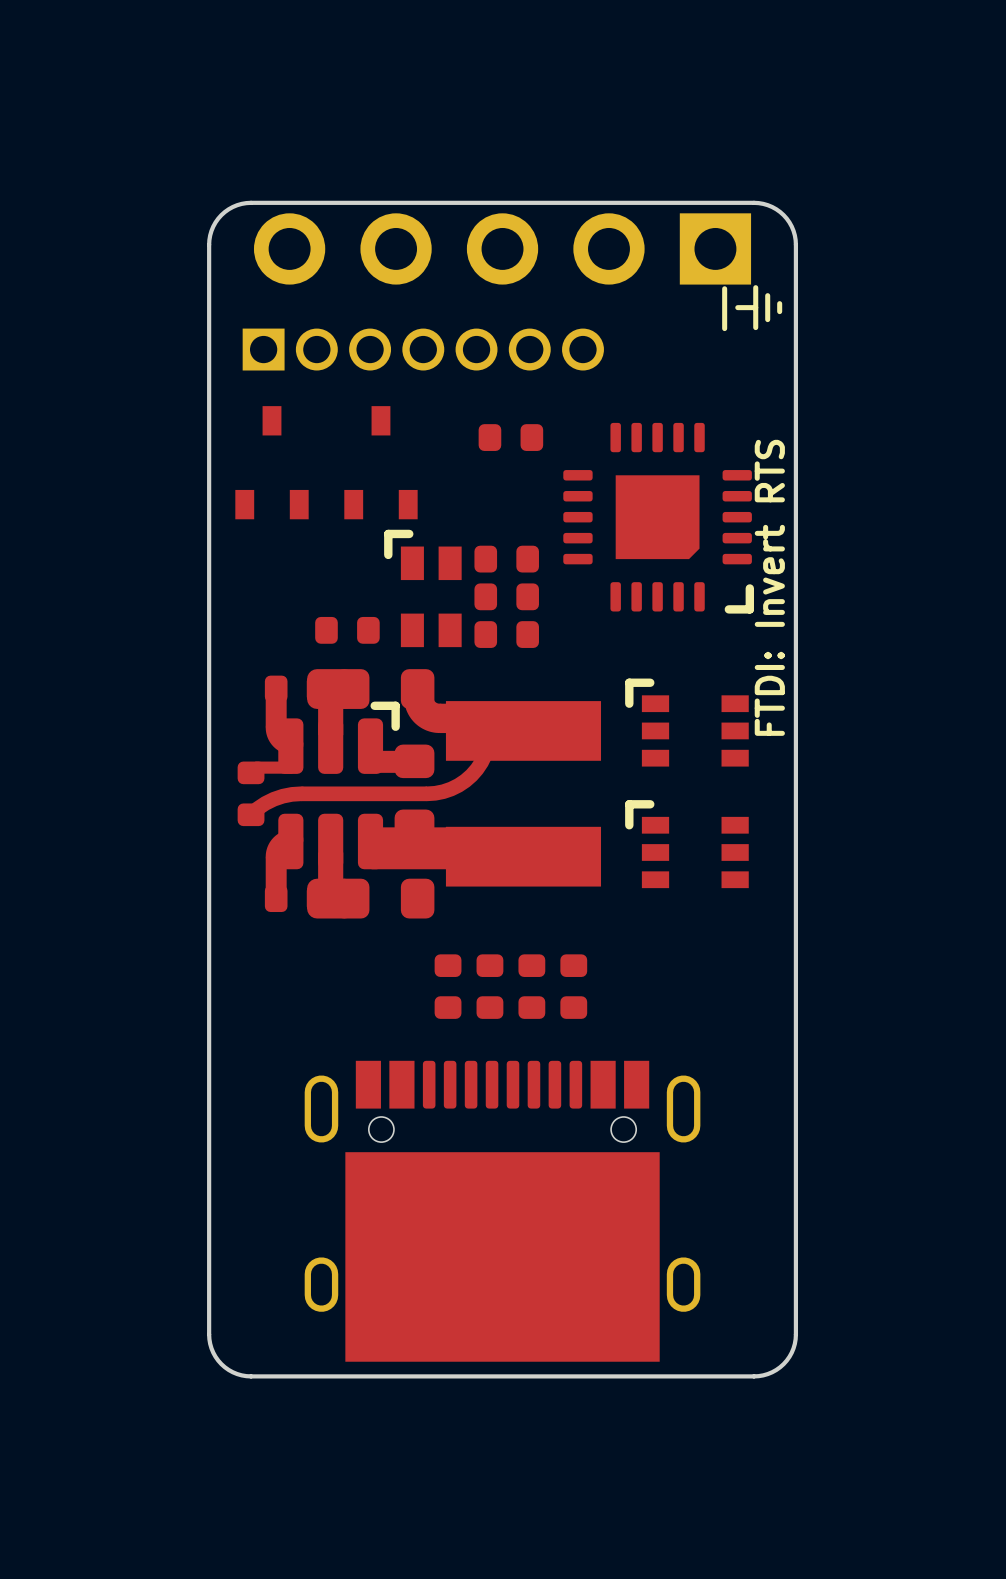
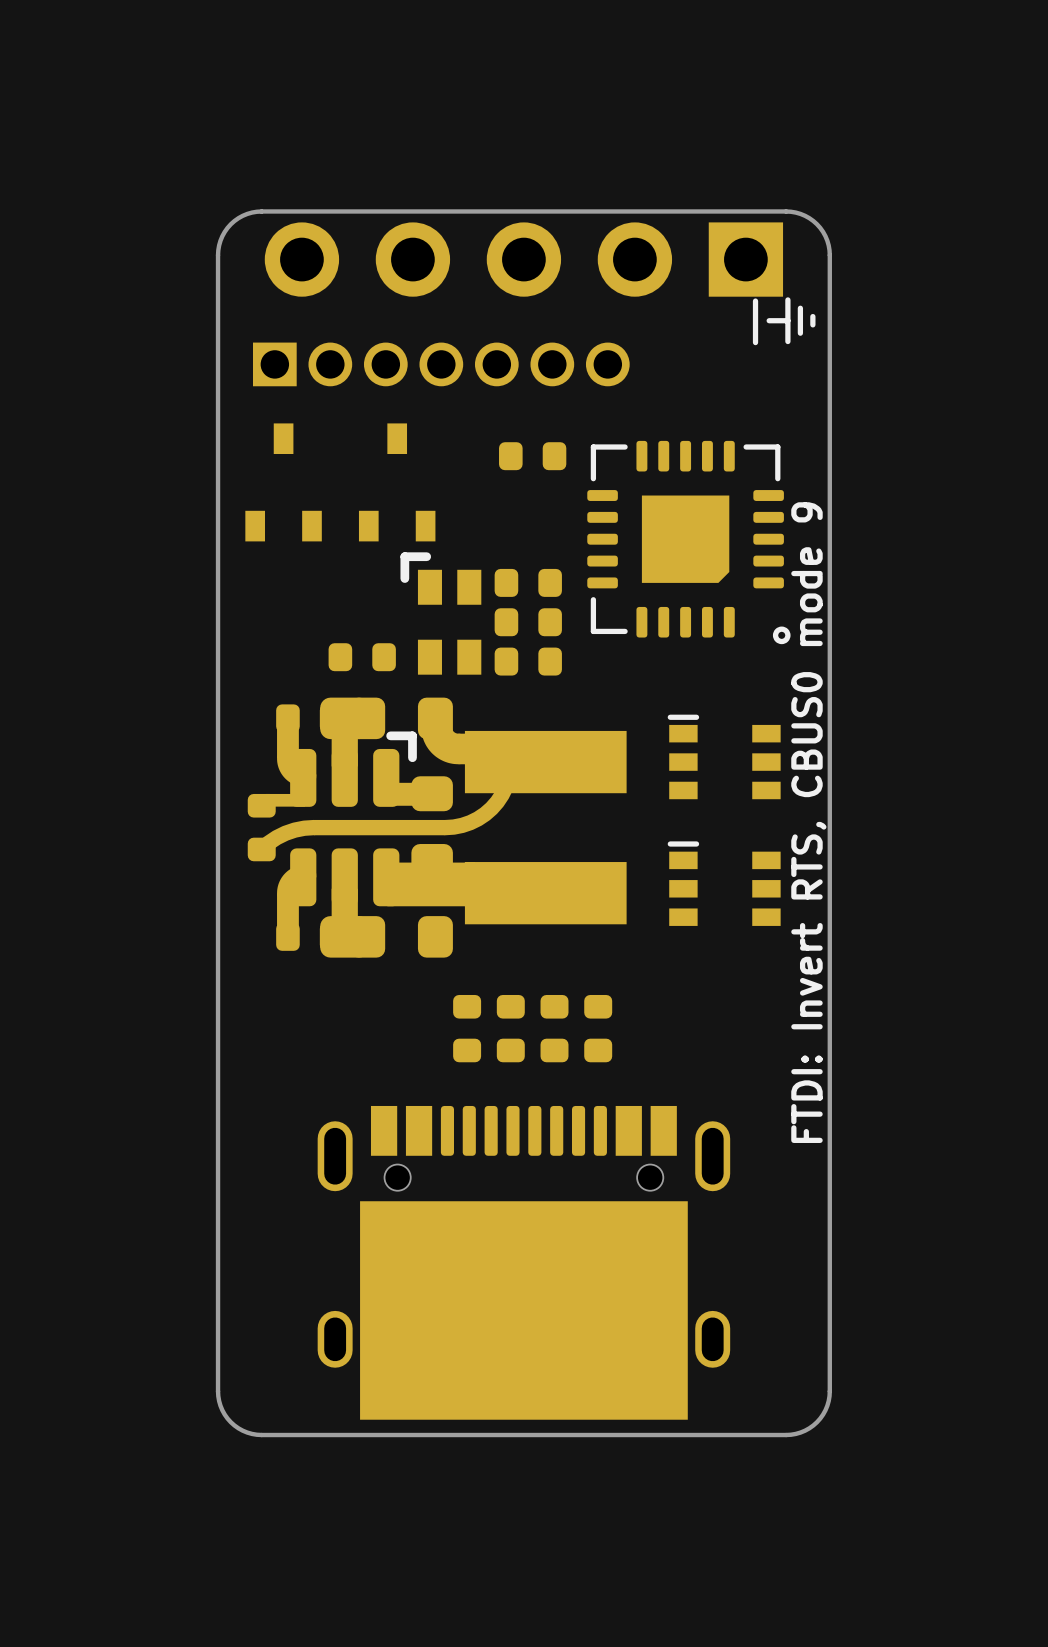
part footprint: [563, 422, 755, 614] -> [587, 440, 791, 645]
text: FTDI: Invert RTS (769, 587) -> FTDI: Invert RTS, CBUS0 mode 9 (808, 822)
part footprint: [625, 678, 749, 767] -> [667, 714, 781, 800]
part footprint: [625, 800, 749, 889] -> [667, 841, 781, 926]

